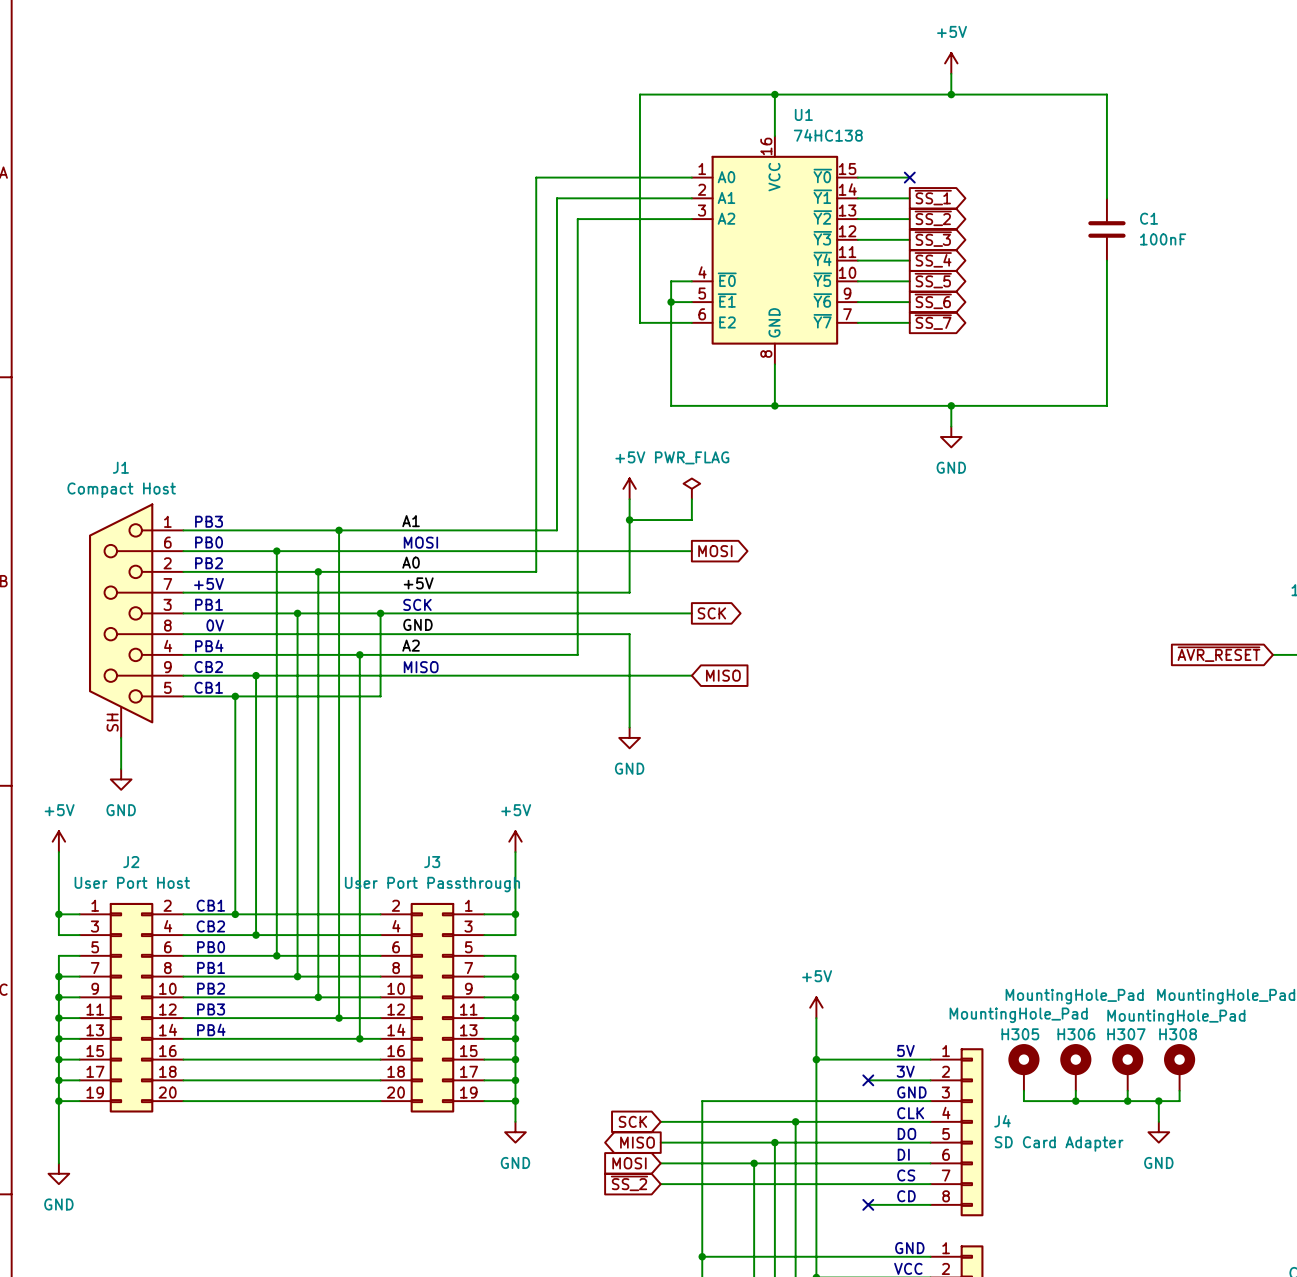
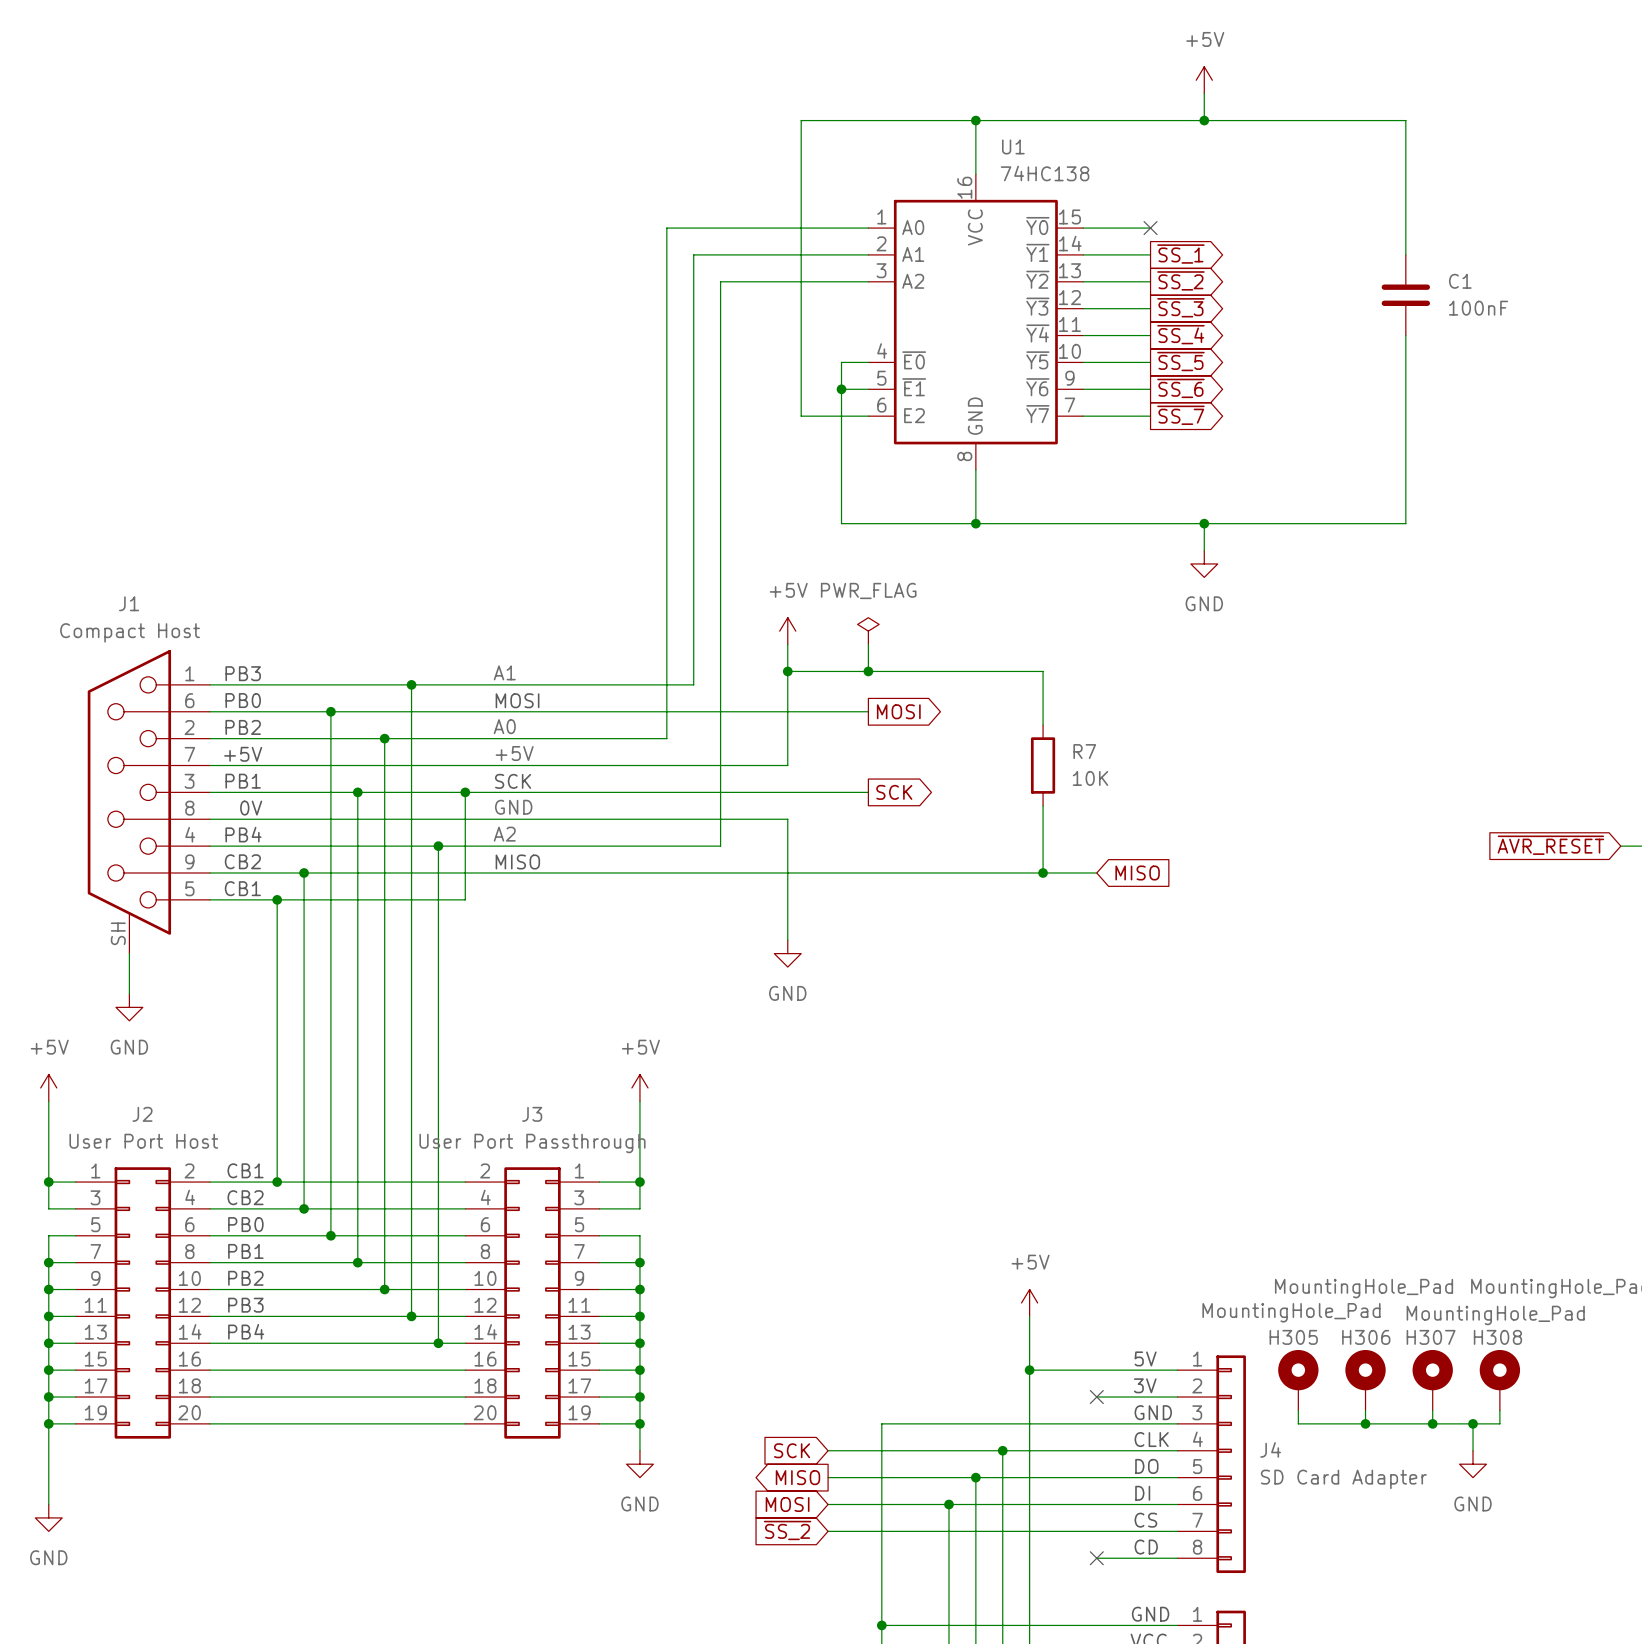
wire: none -> (868, 671) (1043, 671) (1043, 725)
junction: none -> (868, 671)
R7: none -> 10K (1043, 765)
wire: none -> (1043, 805) (1043, 873)
wire: none -> (868, 873) (1096, 873)
global label position: MISO (723, 675) -> MISO (1137, 873)
junction: none -> (1043, 873)

